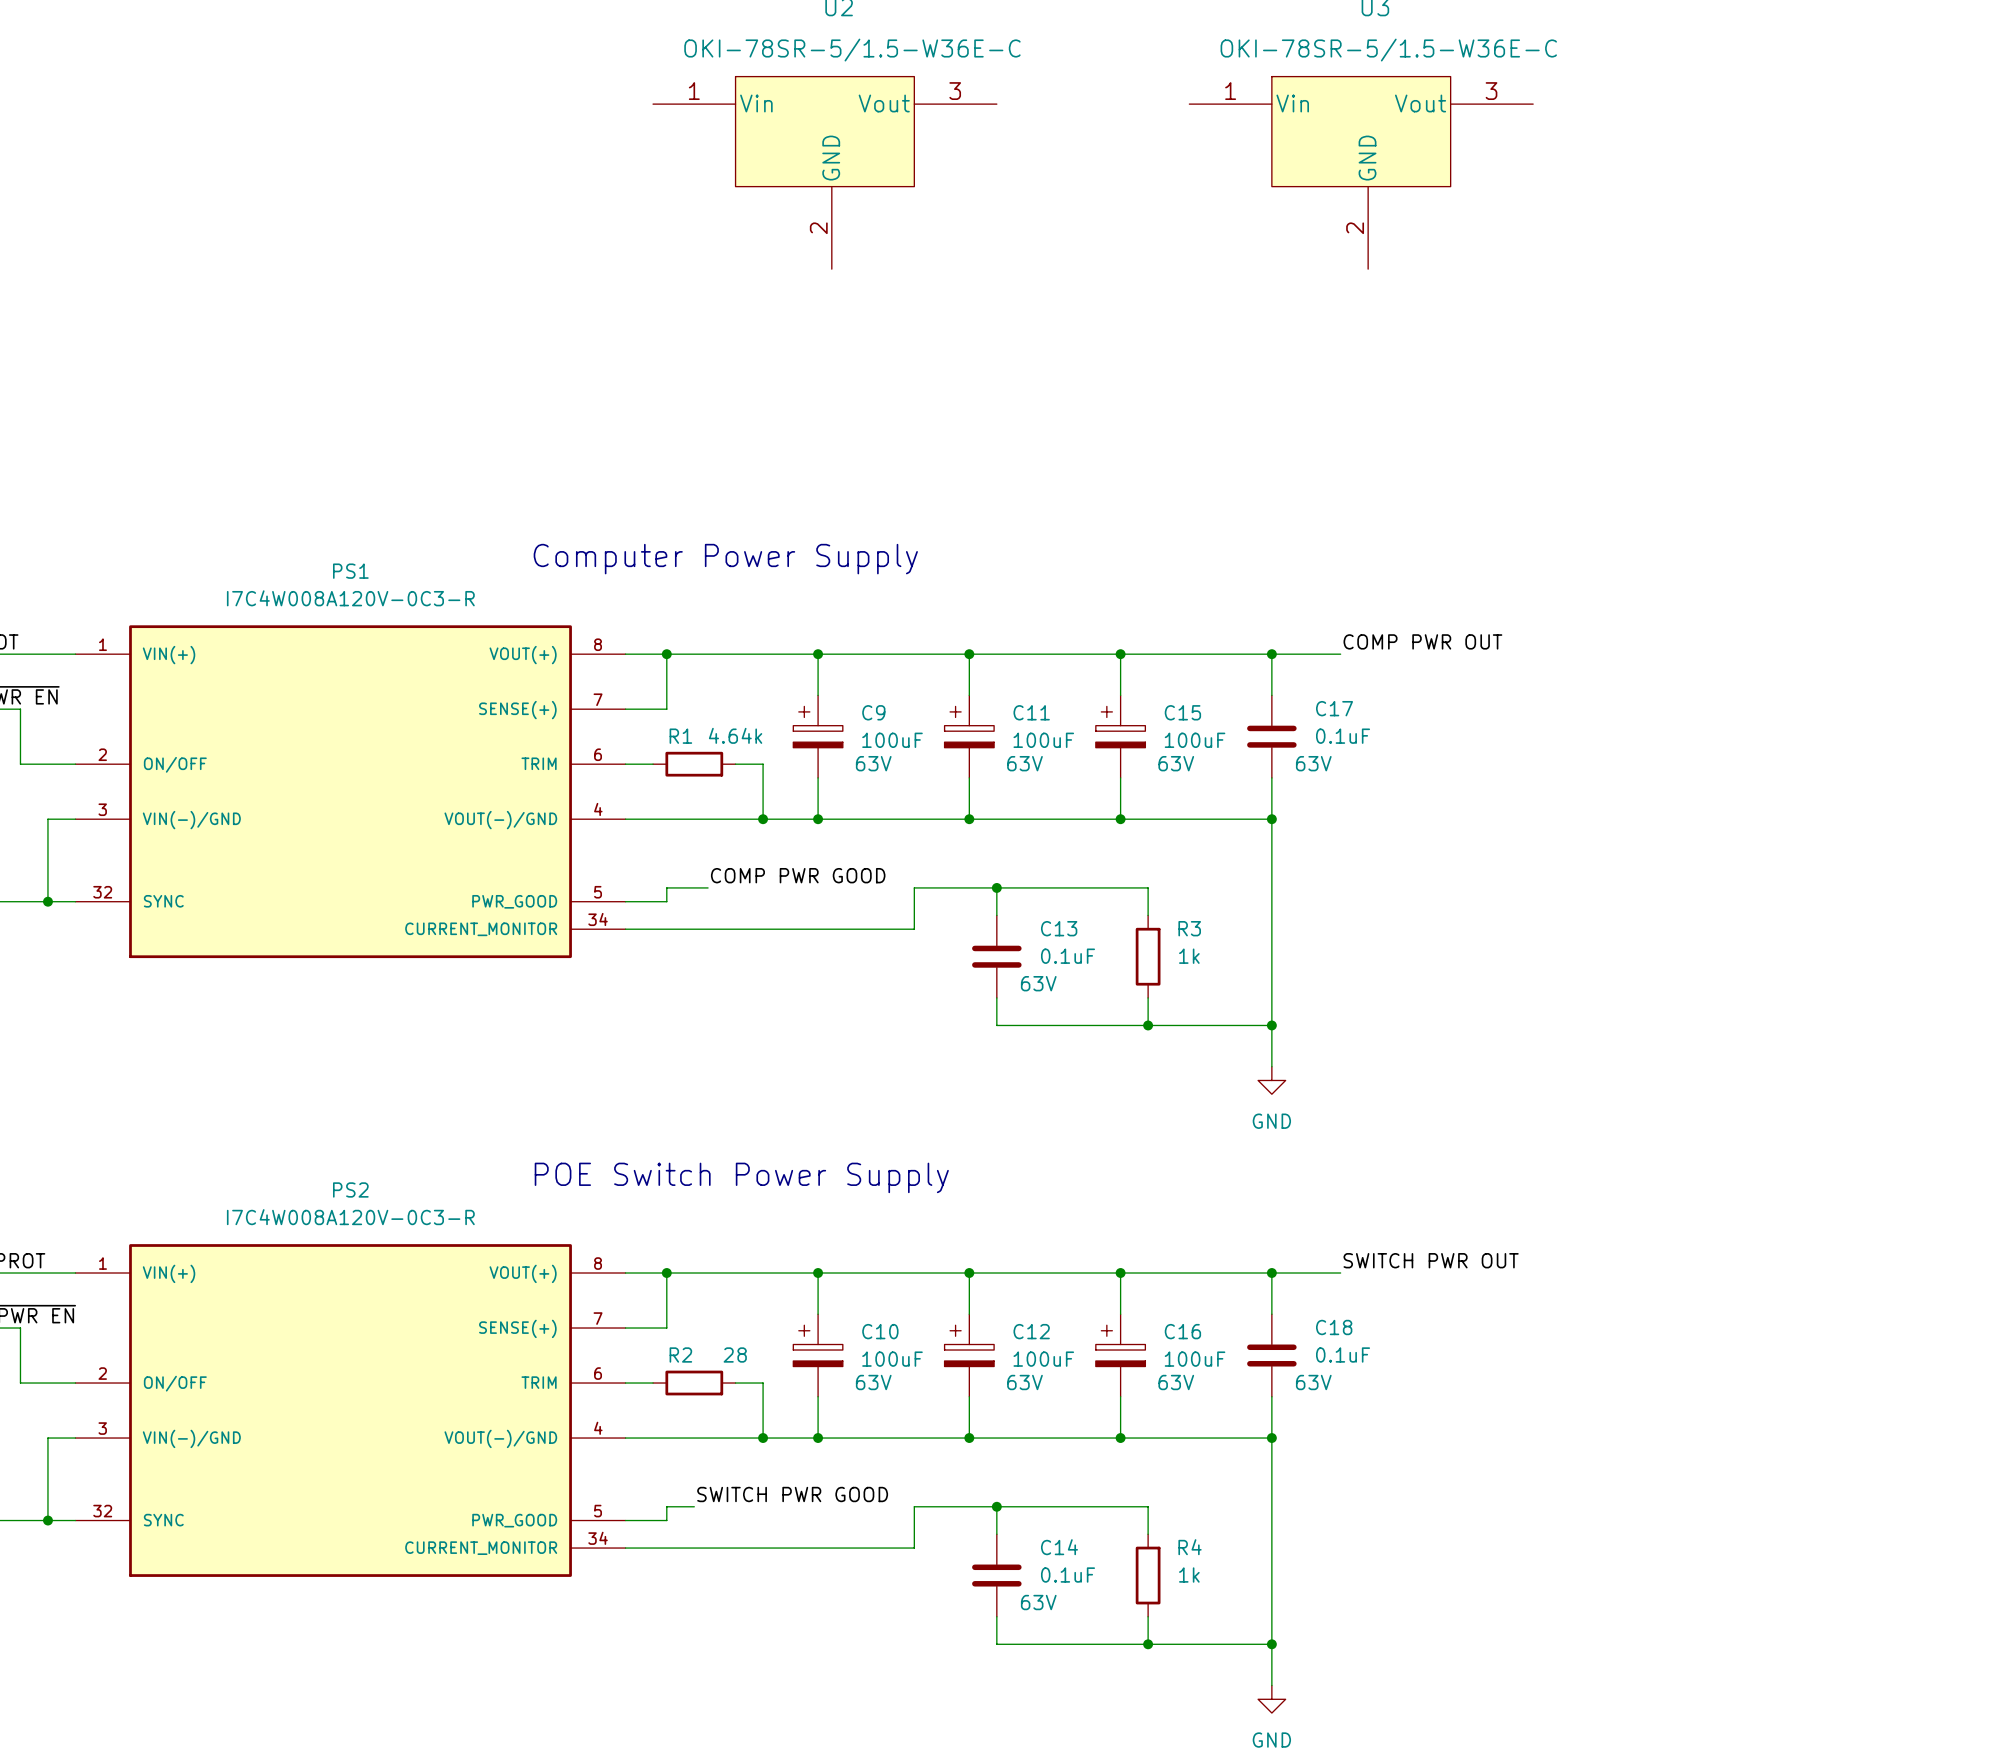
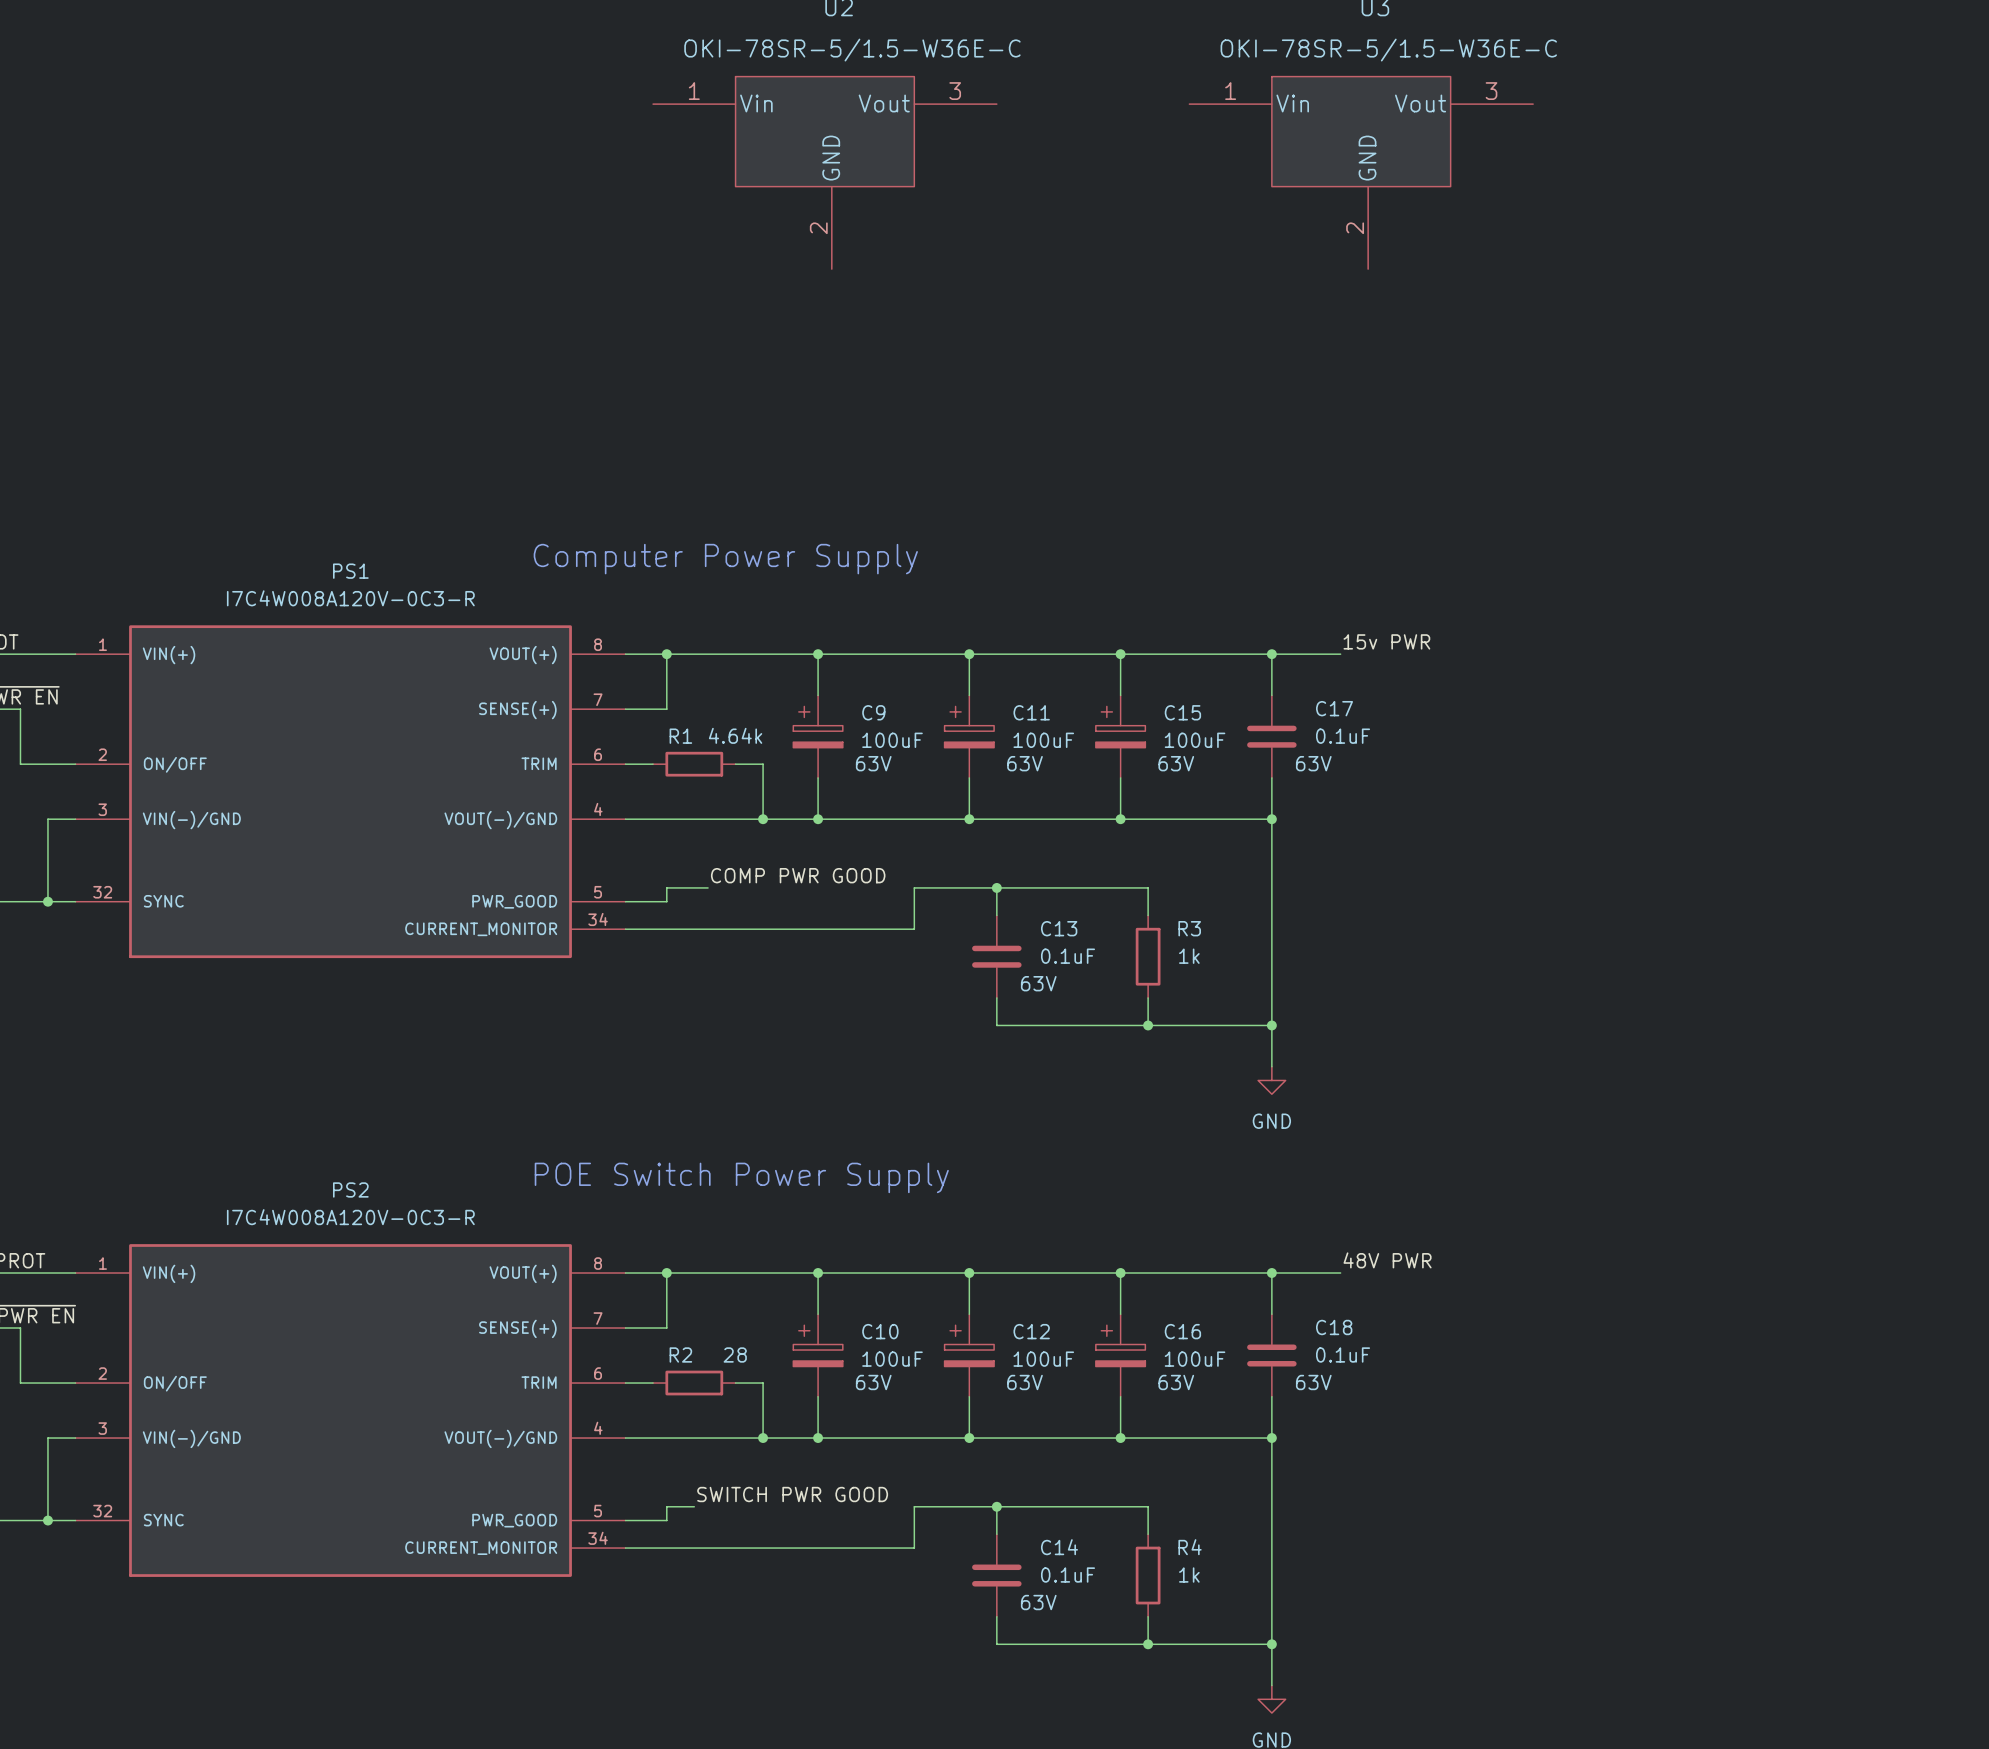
label: COMP PWR OUT (1422, 641) -> 15v PWR (1386, 641)
label: SWITCH PWR OUT (1431, 1260) -> 48V PWR (1387, 1260)

